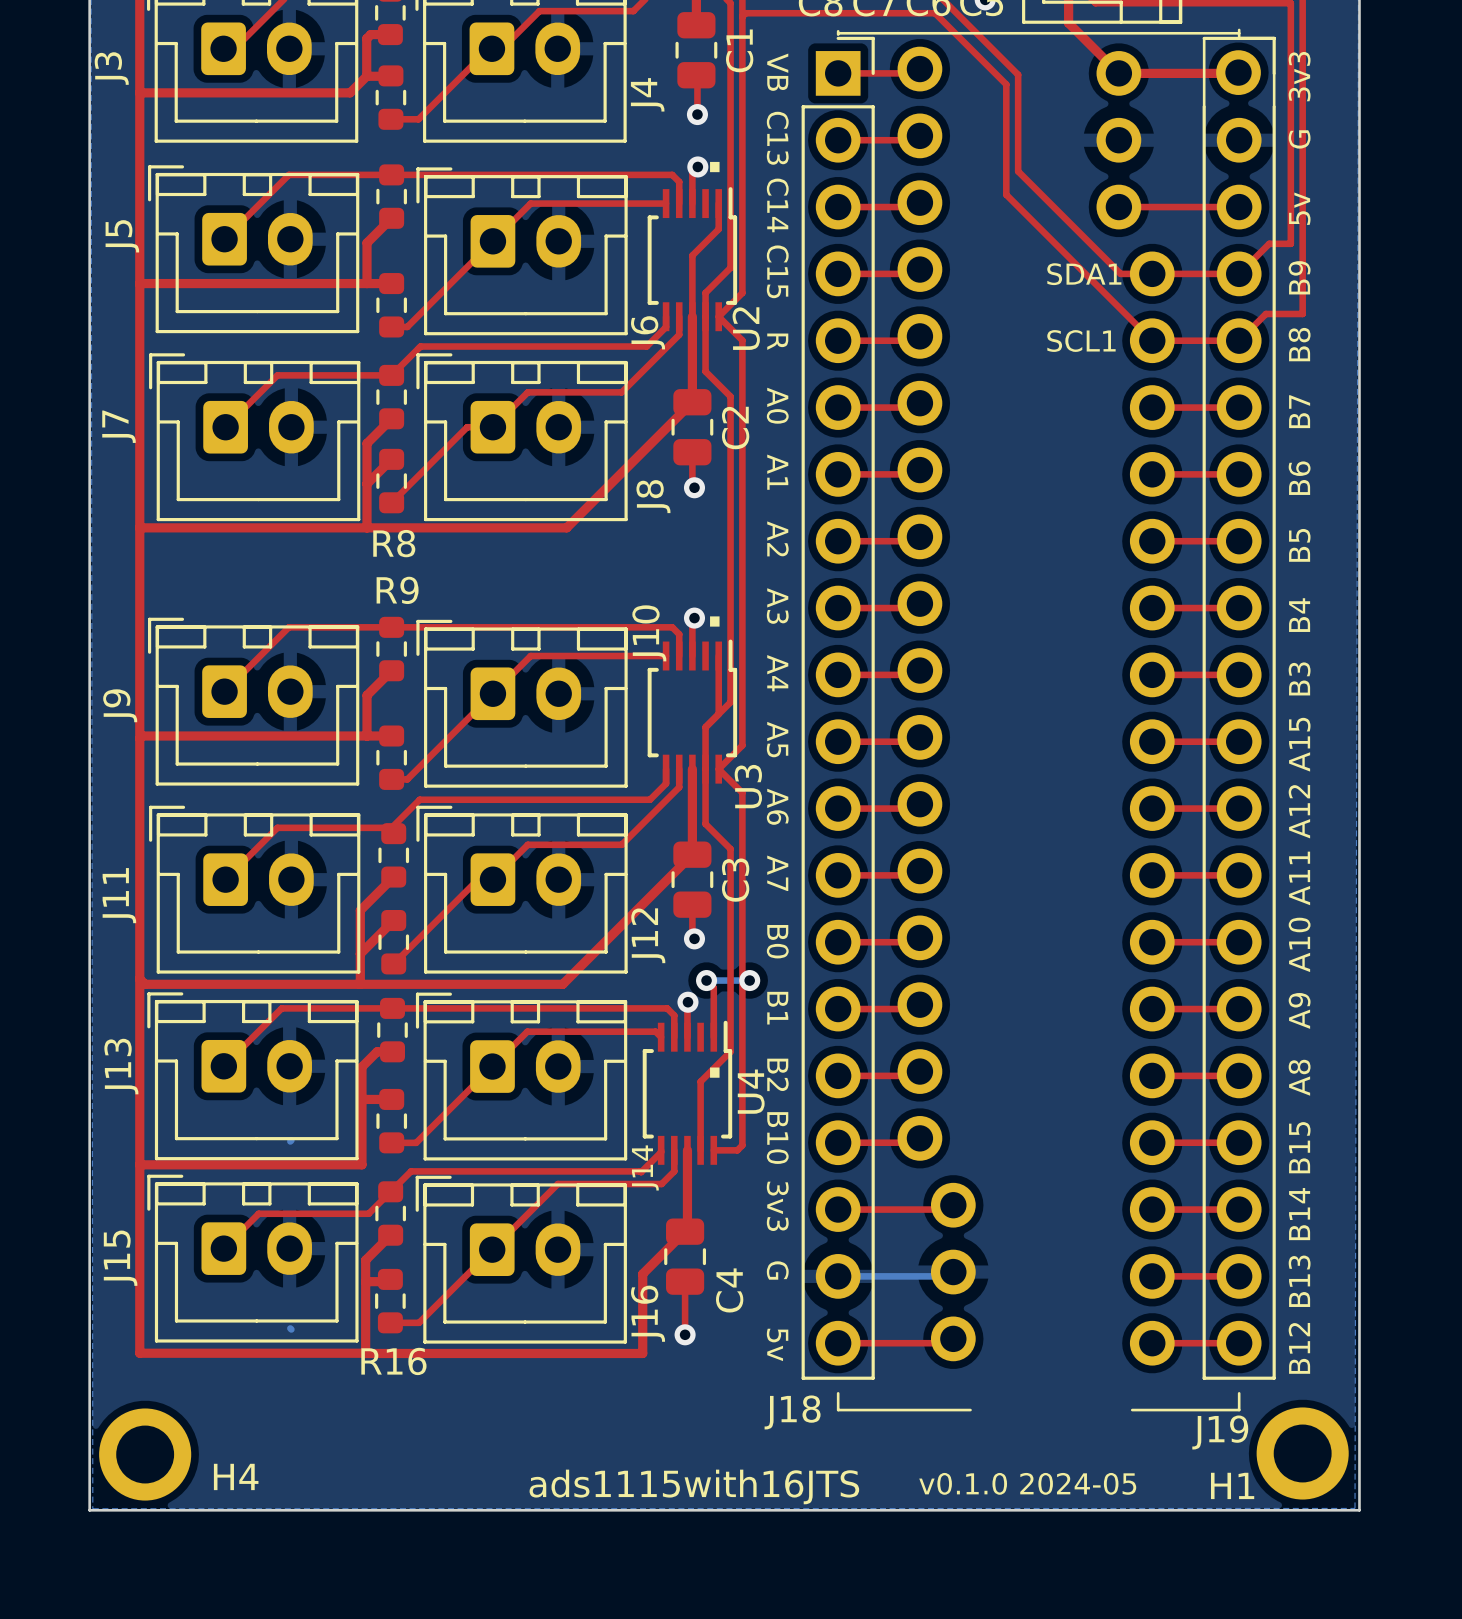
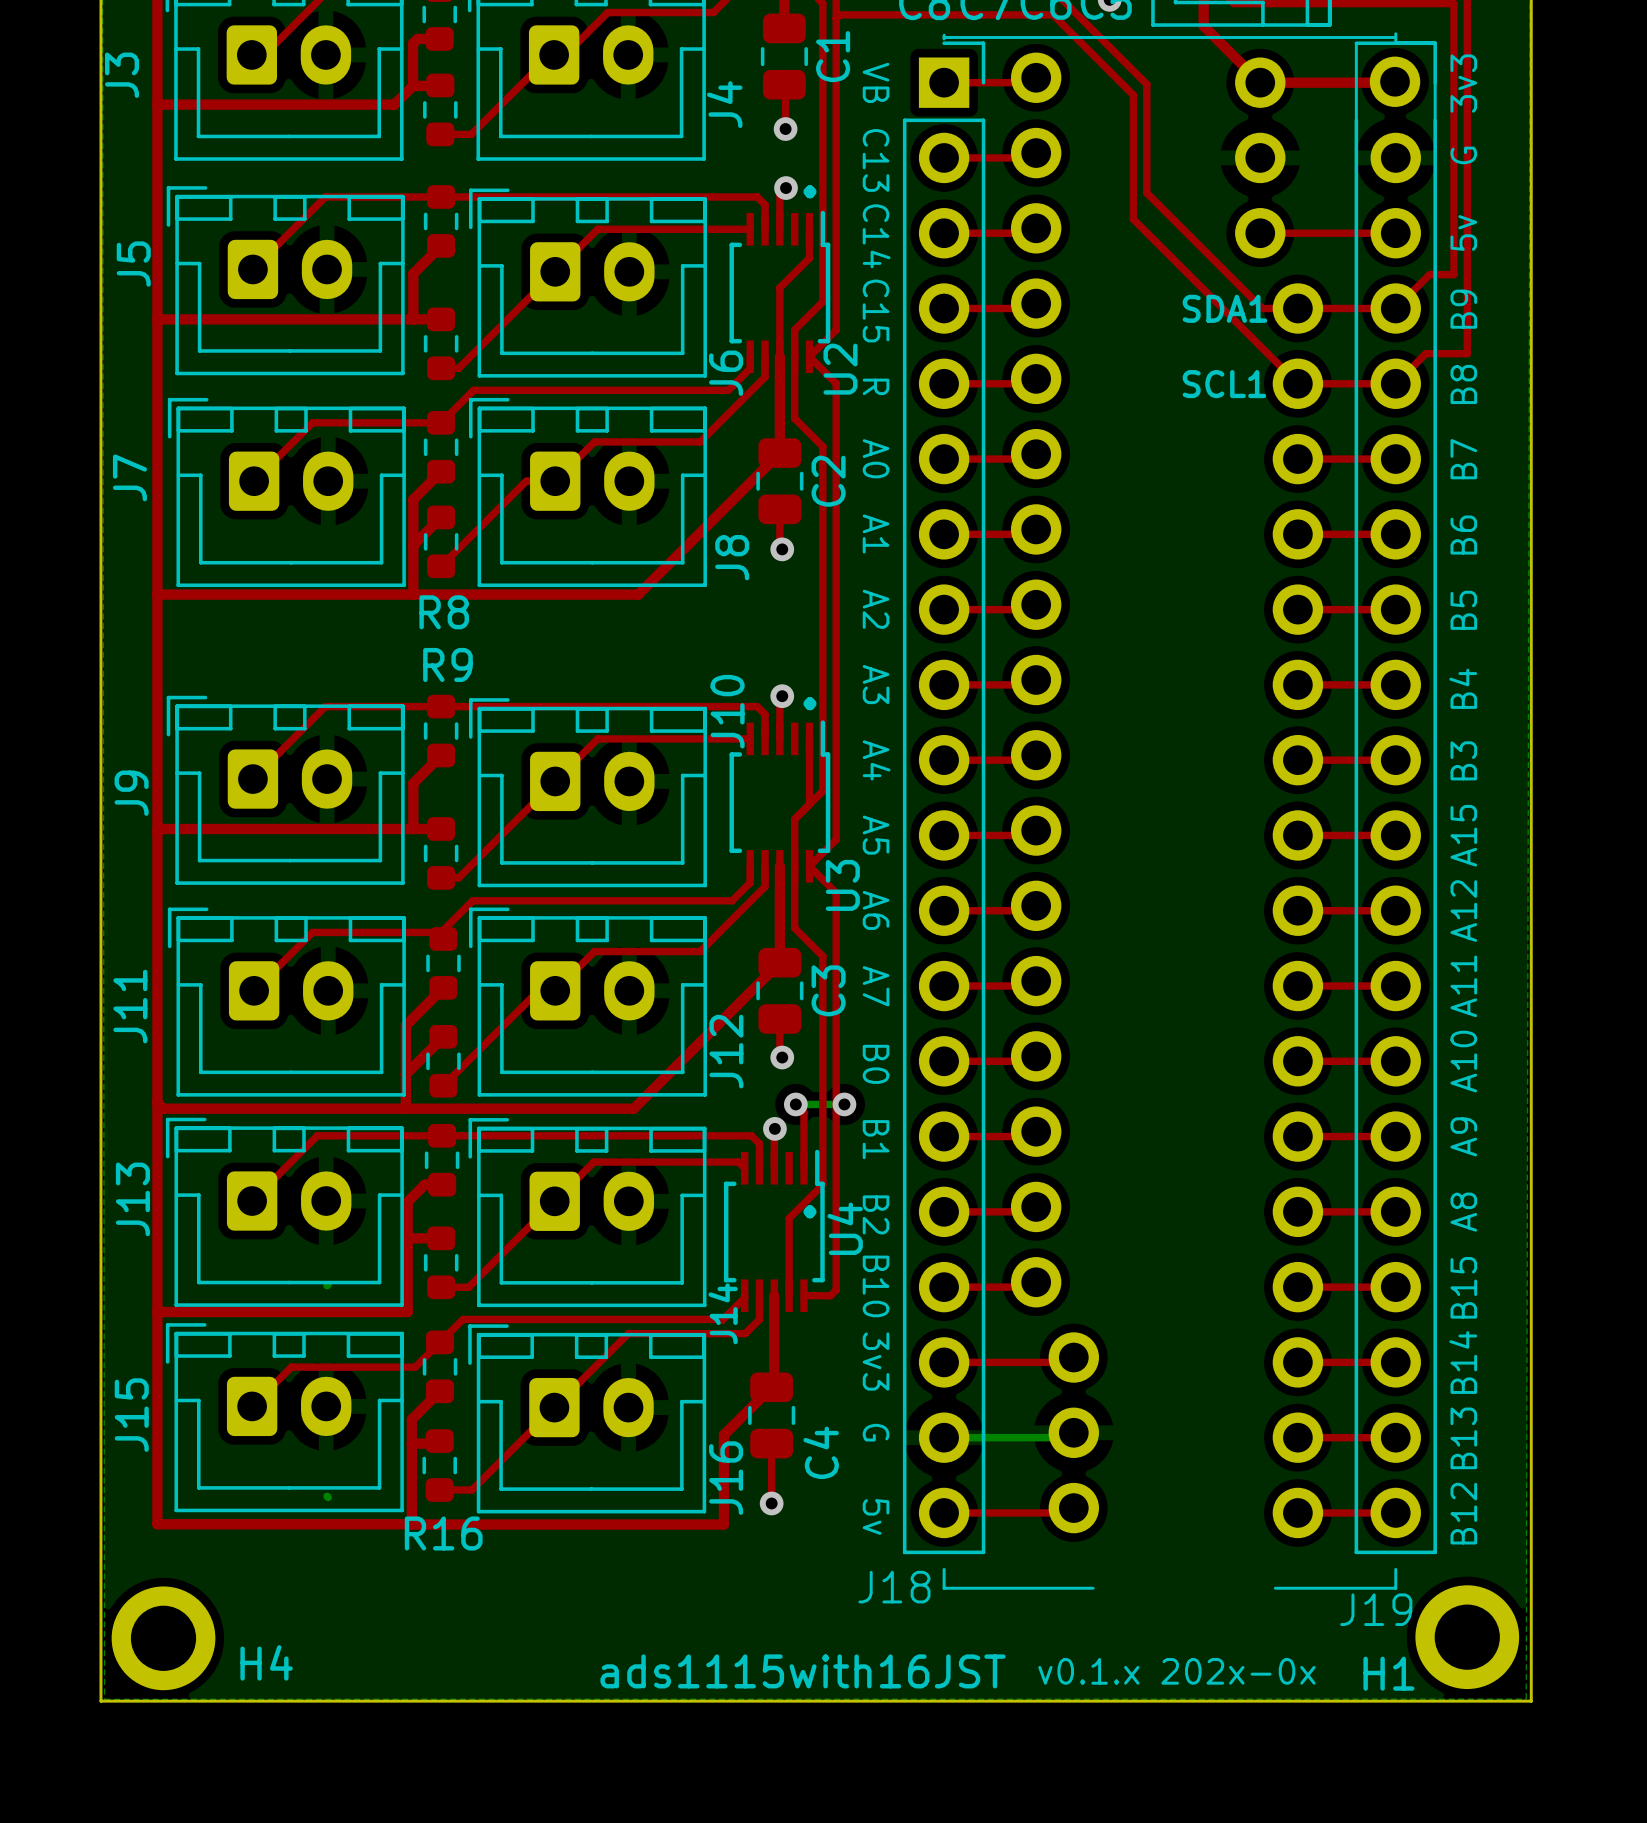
text: v0.1.0 2024-05 (1027, 1483) -> v0.1.x 202x-0x (1176, 1671)
text: ads1115with16JTS (694, 1486) -> ads1115with16JST (803, 1671)

